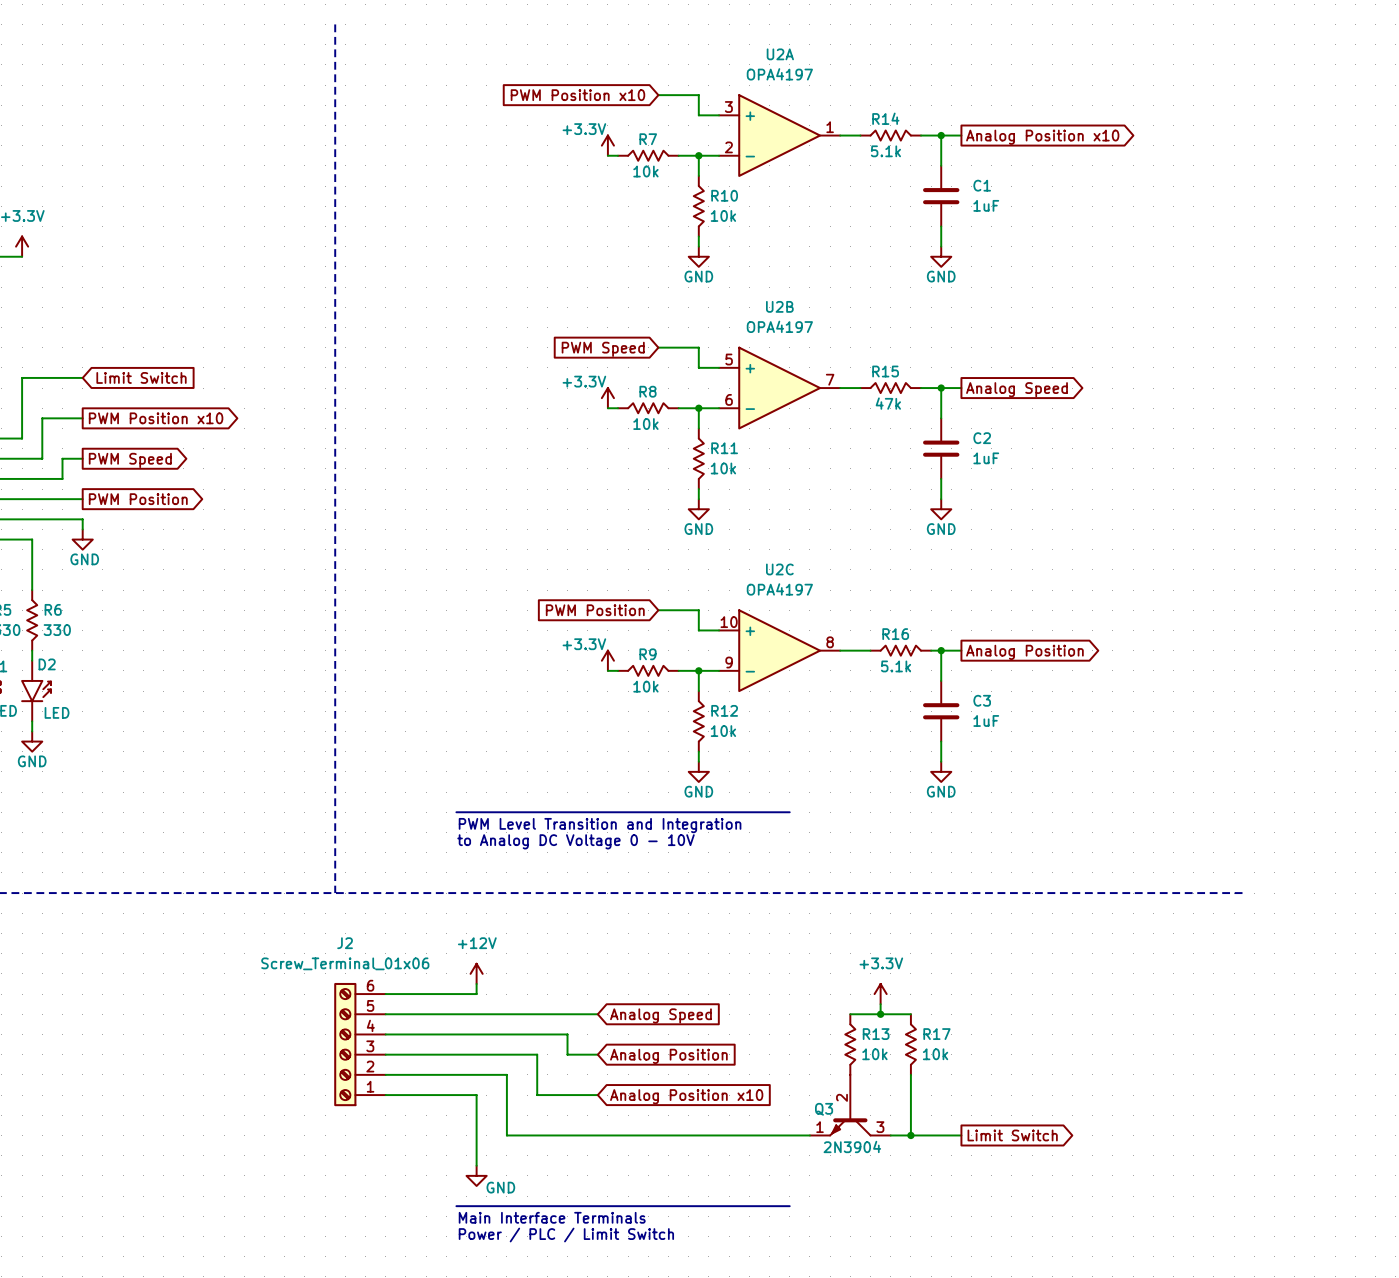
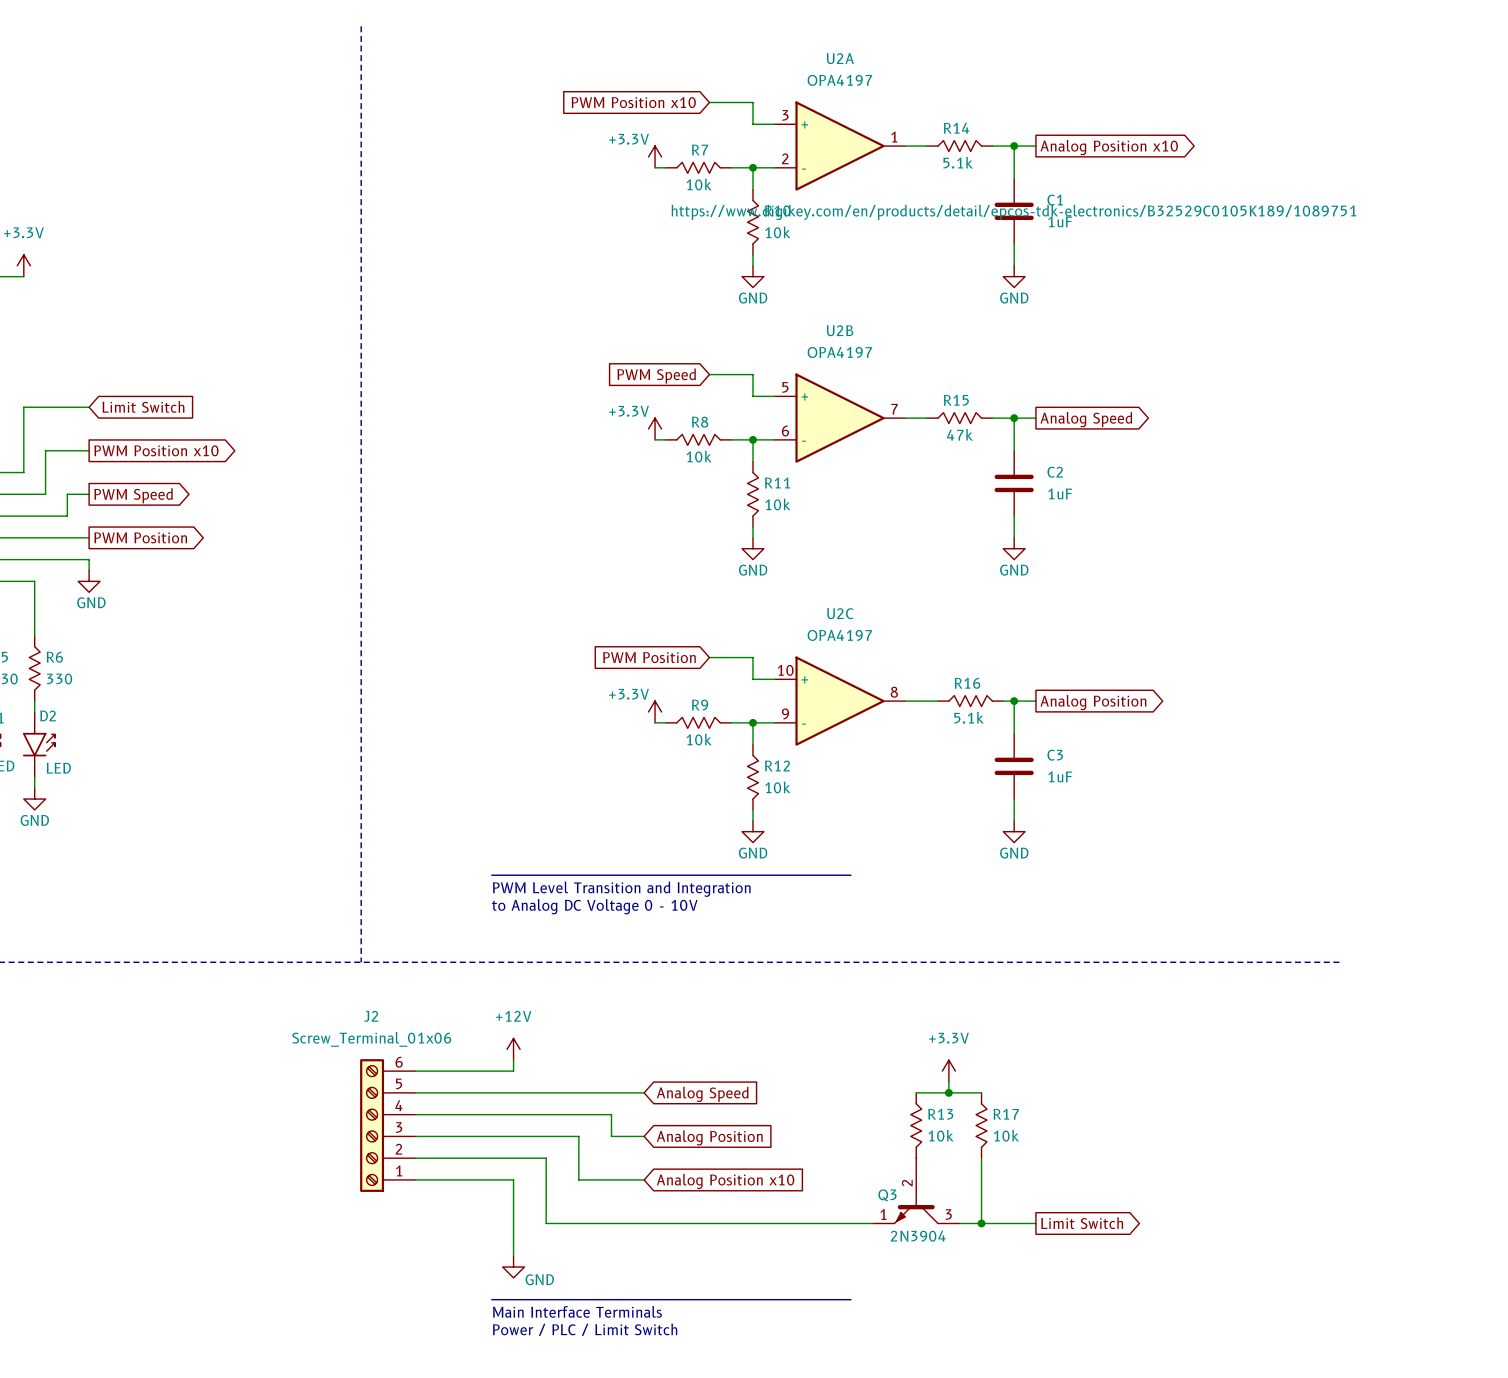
C1 text: none -> https://www.digikey.com/en/products/detail/epcos-tdk-electronics/B32529C0105K189/1089751 (1013, 212)

